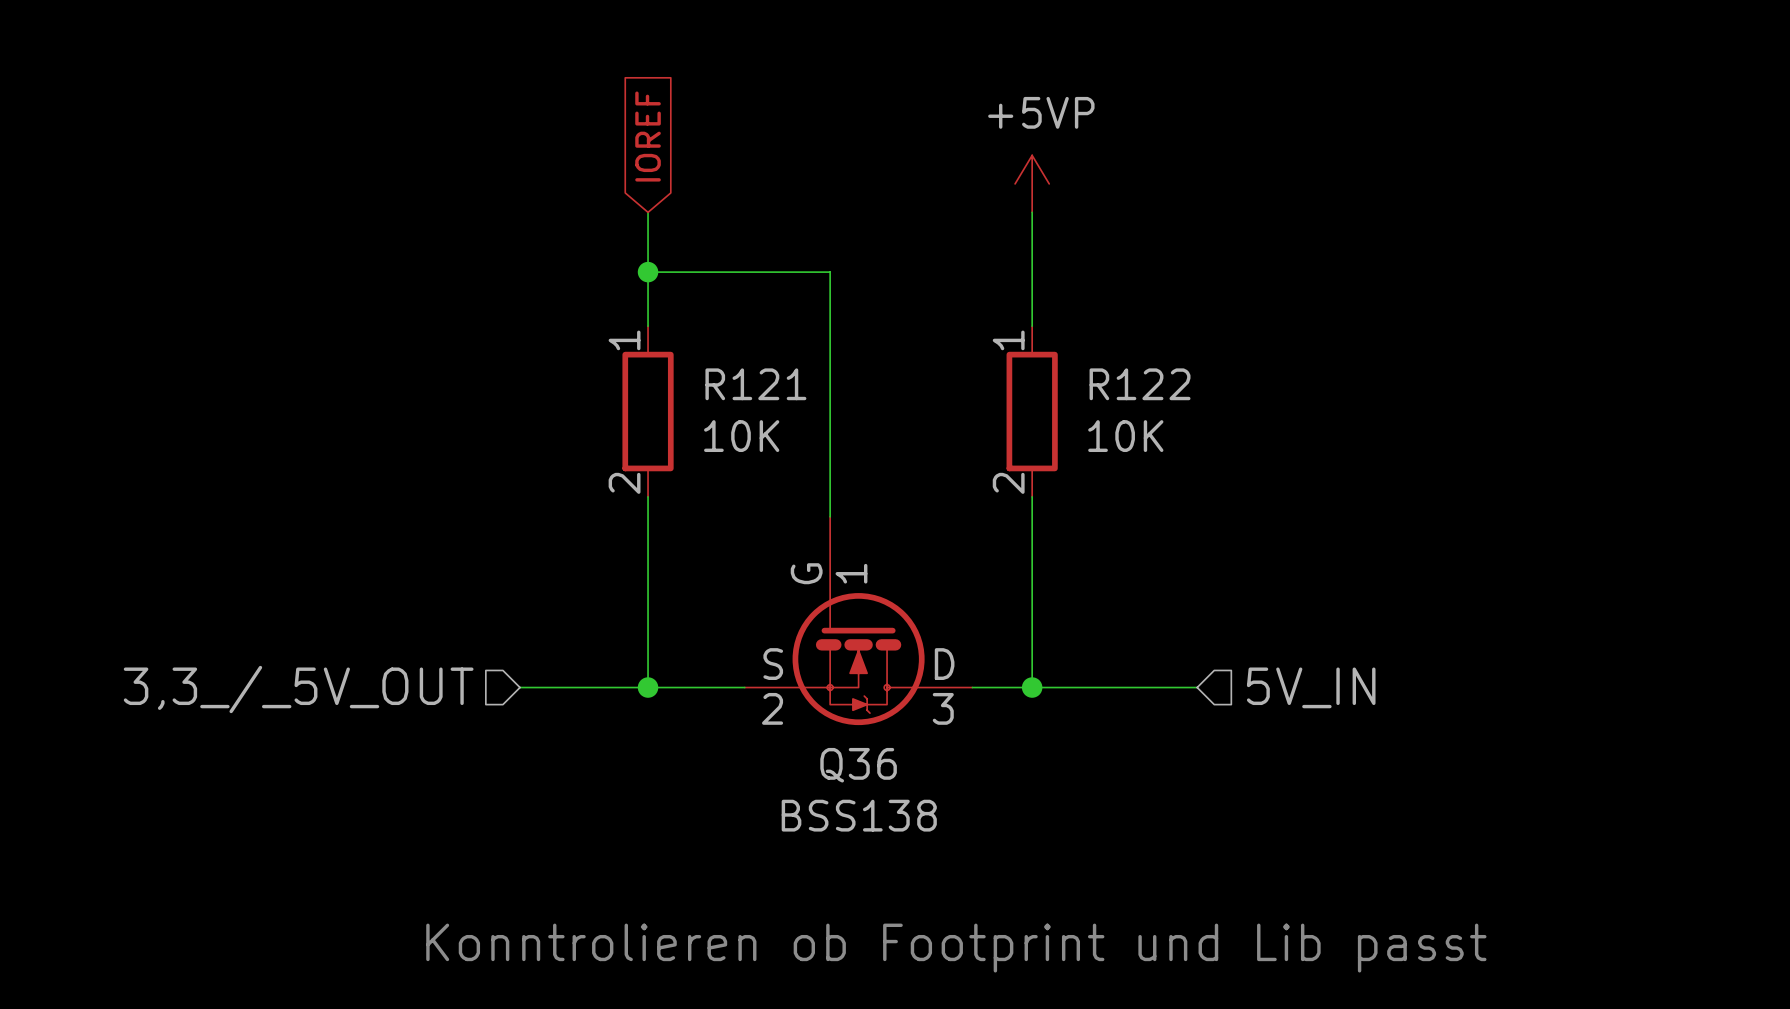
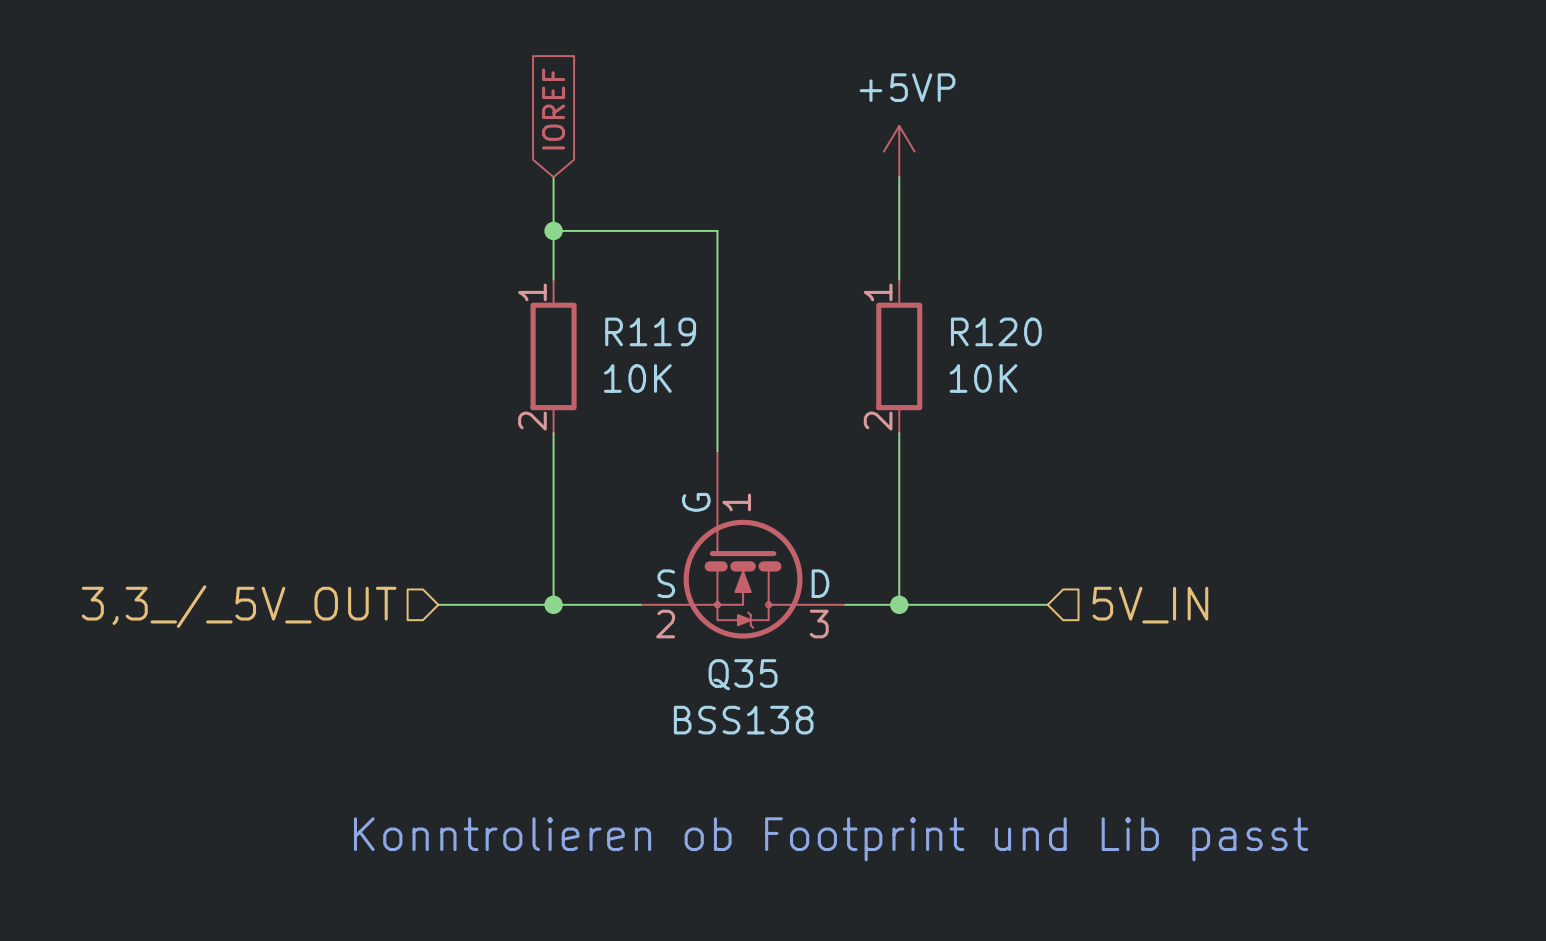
R121 name: R121 (755, 384) -> R119 (650, 331)
R122 name: R122 (1140, 384) -> R120 (996, 331)
Q36 name: Q36 (858, 765) -> Q35 (743, 674)

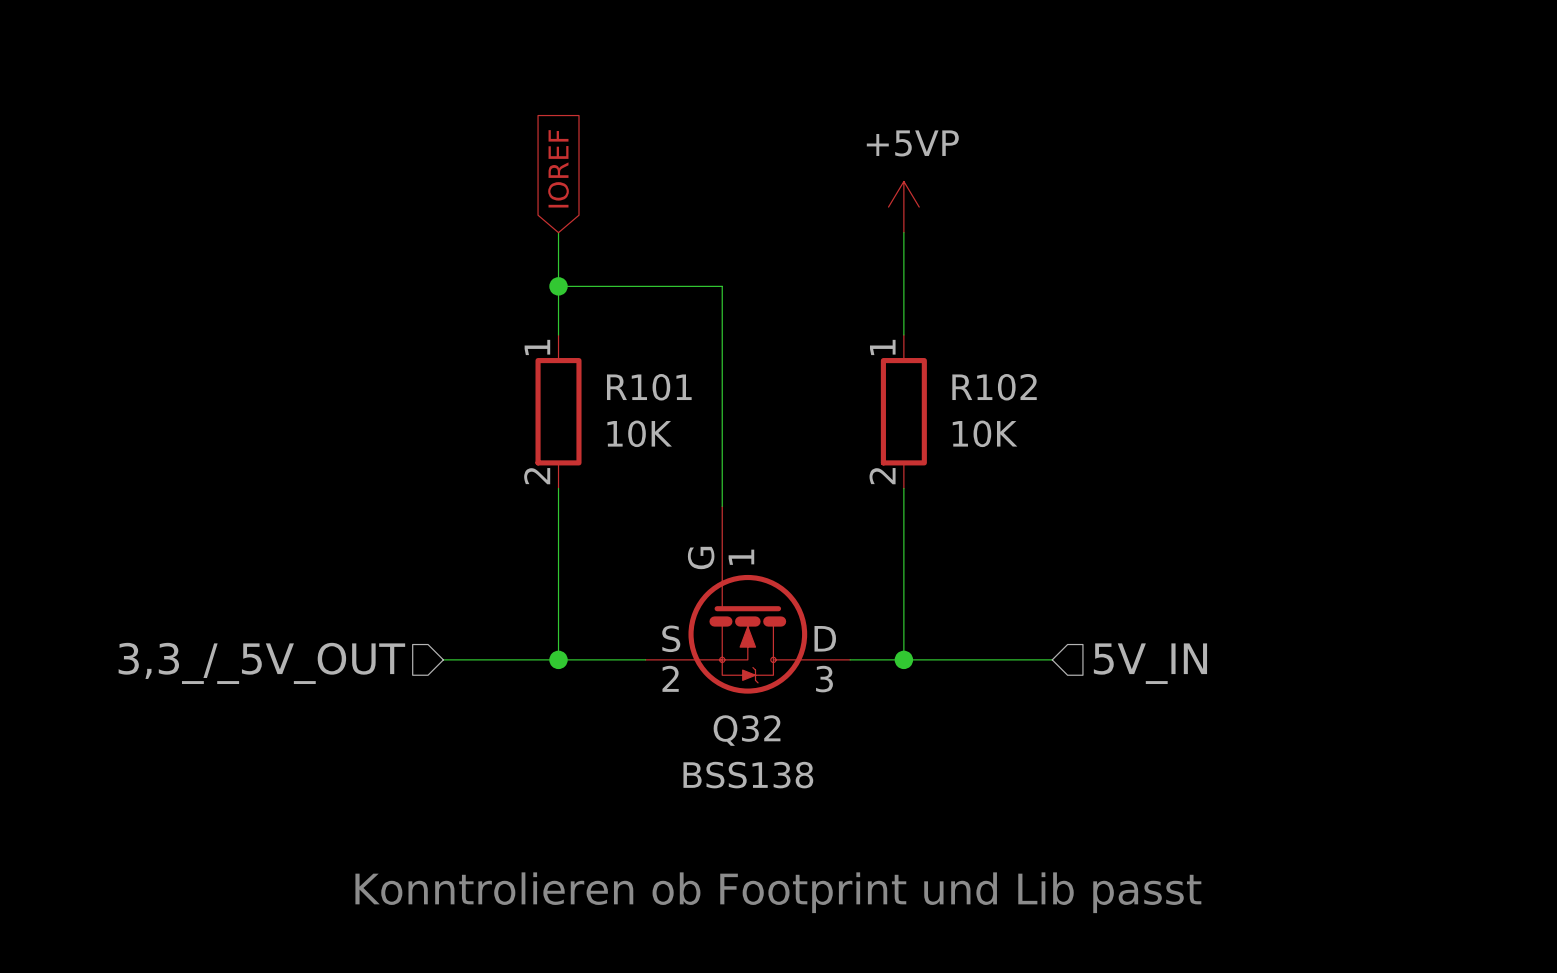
R119 name: R119 (650, 331) -> R101 (649, 387)
R120 name: R120 (996, 331) -> R102 (994, 387)
Q35 name: Q35 (743, 674) -> Q32 (747, 730)

